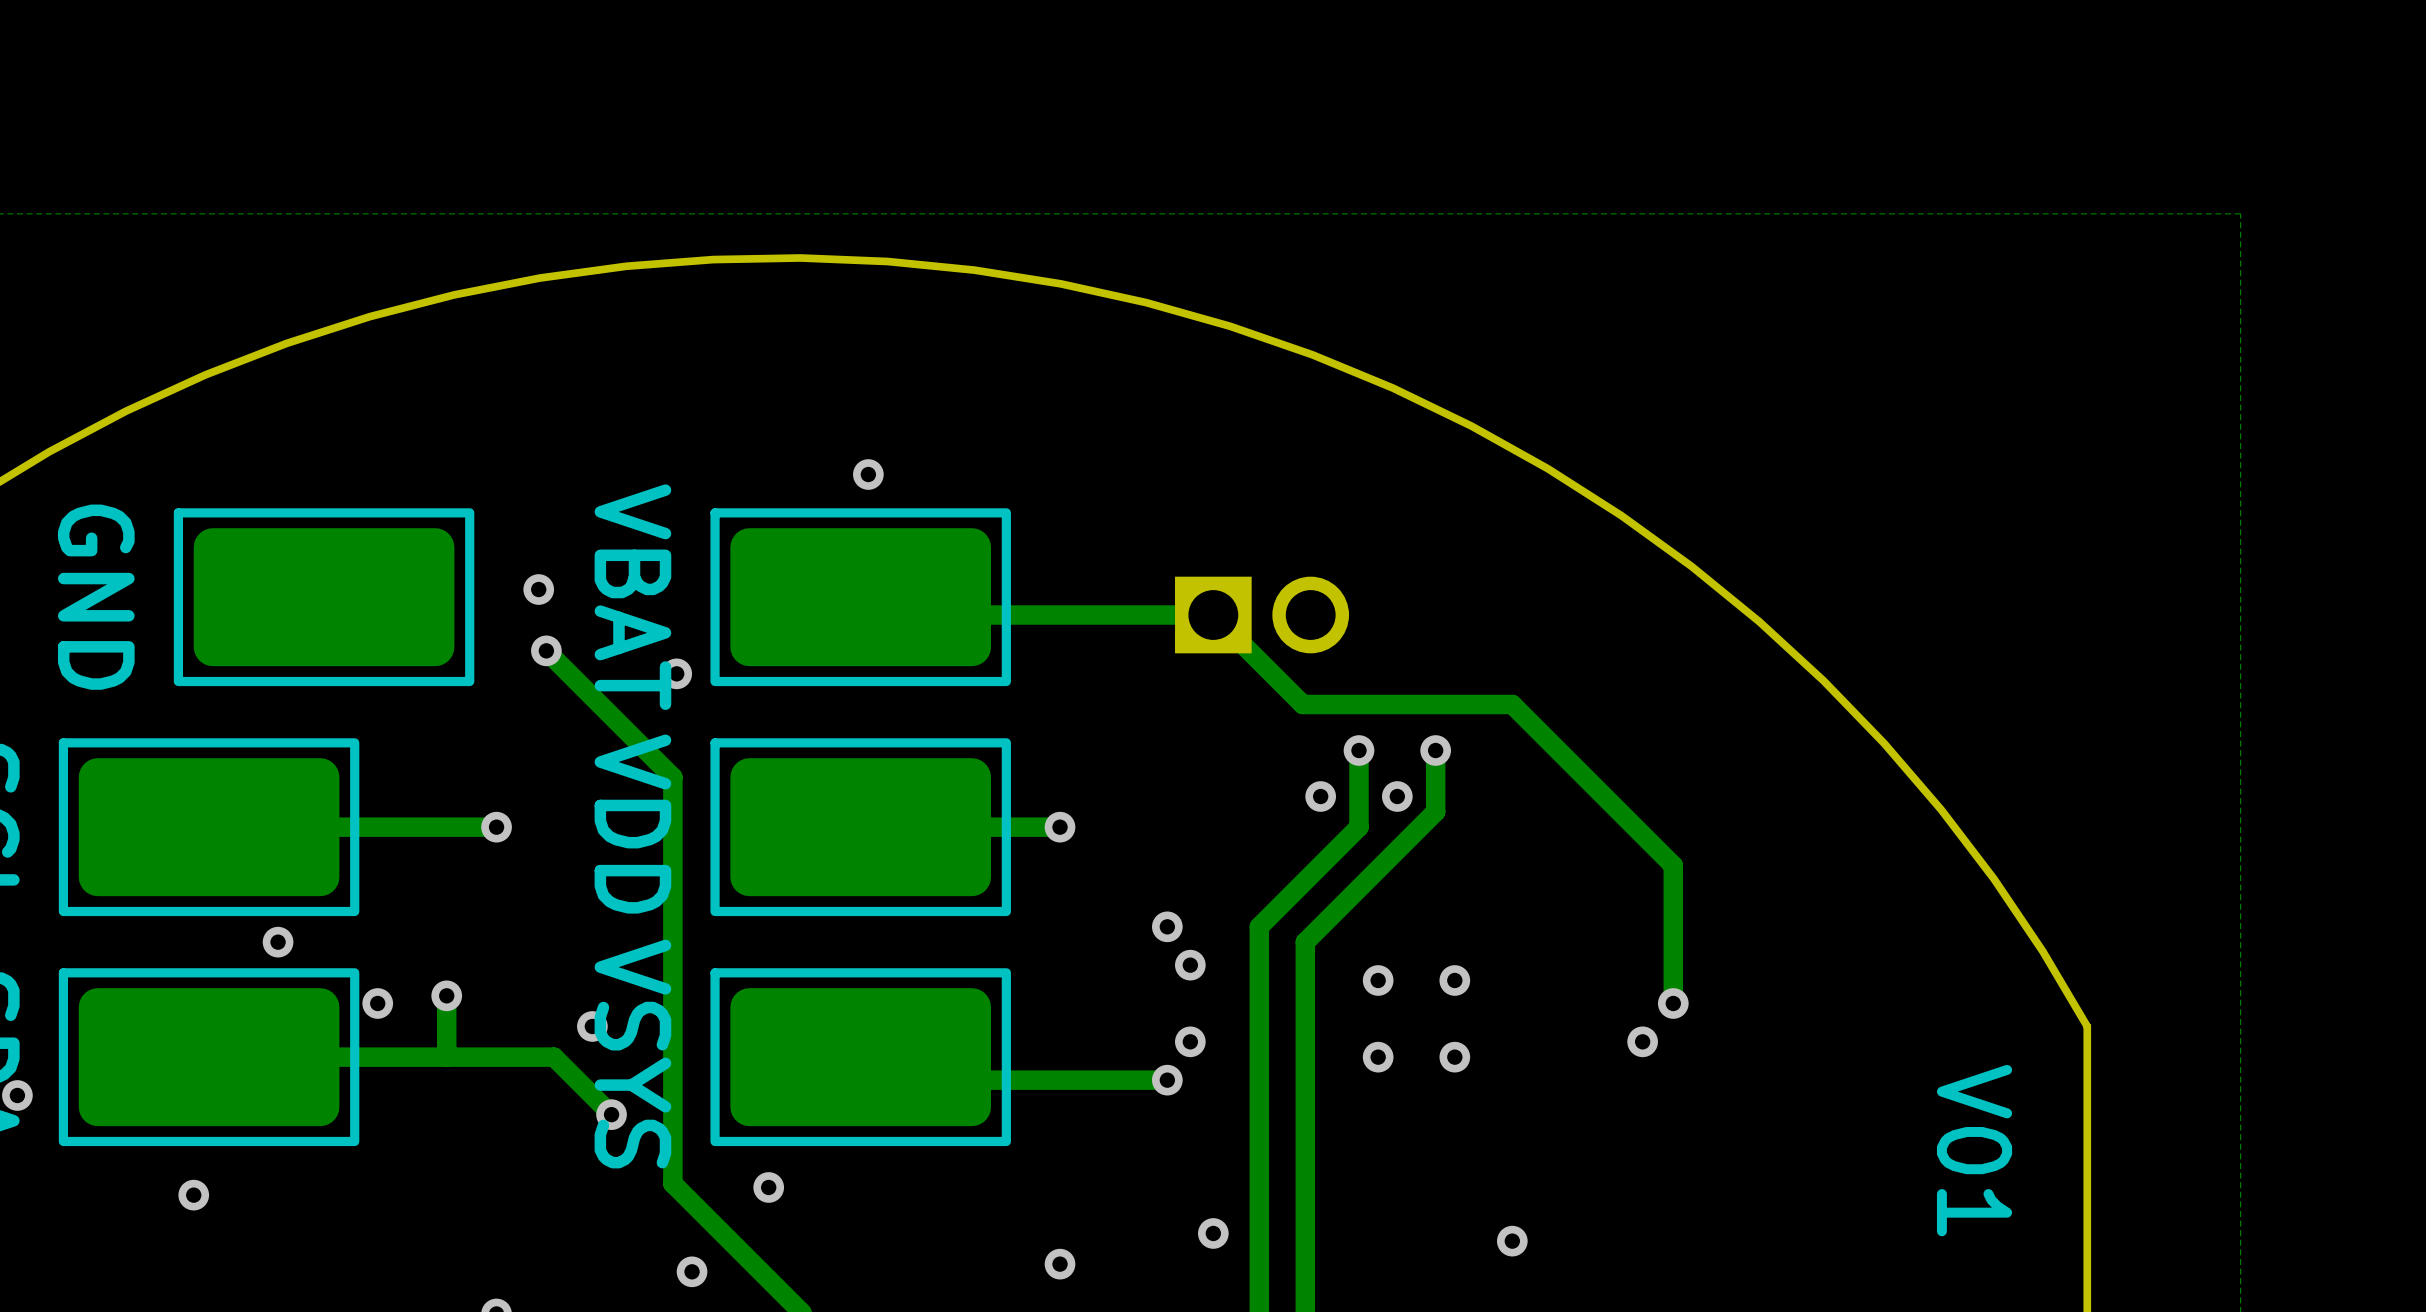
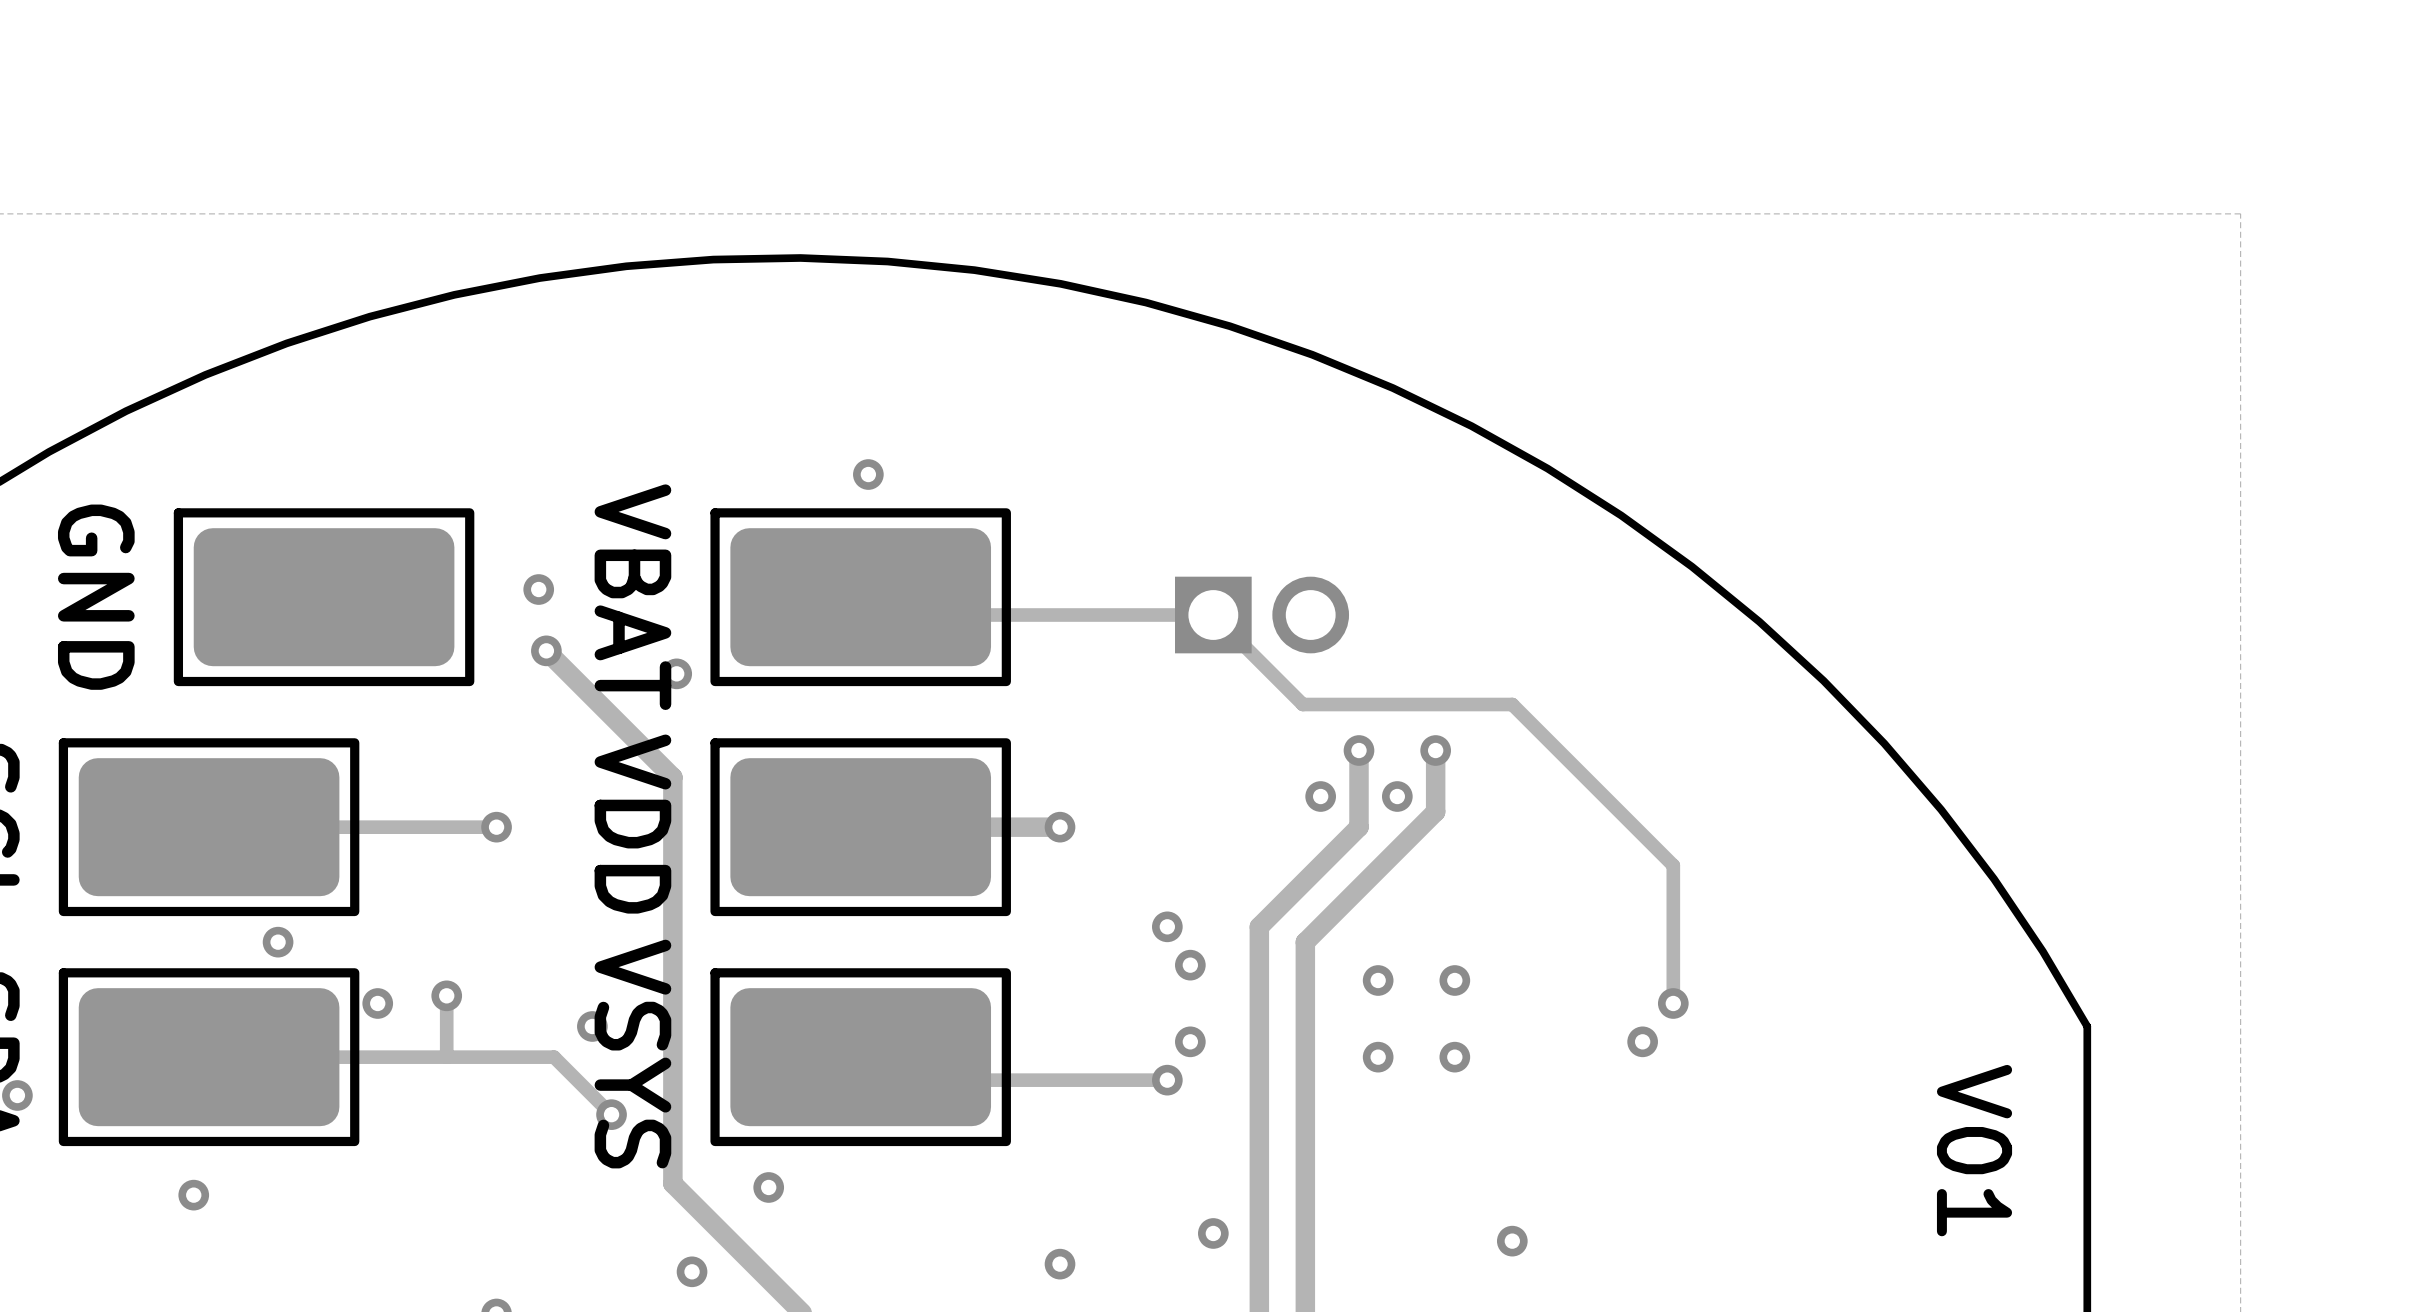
track width: thick (860, 597) (878, 615) (1213, 615) (1302, 704) (1512, 704) (1673, 865) (1673, 1003) -> thin (860, 597) (878, 615) (1213, 615) (1302, 704) (1512, 704) (1673, 865) (1673, 1003)
track width: thick (496, 827) (209, 827) -> thin (496, 827) (209, 827)
track width: thick (446, 995) (446, 1057) -> thin (446, 995) (446, 1057)
track width: thick (209, 1057) (554, 1057) (611, 1114) -> thin (209, 1057) (554, 1057) (611, 1114)
track width: thick (860, 1057) (883, 1080) (1167, 1080) -> thin (860, 1057) (883, 1080) (1167, 1080)

